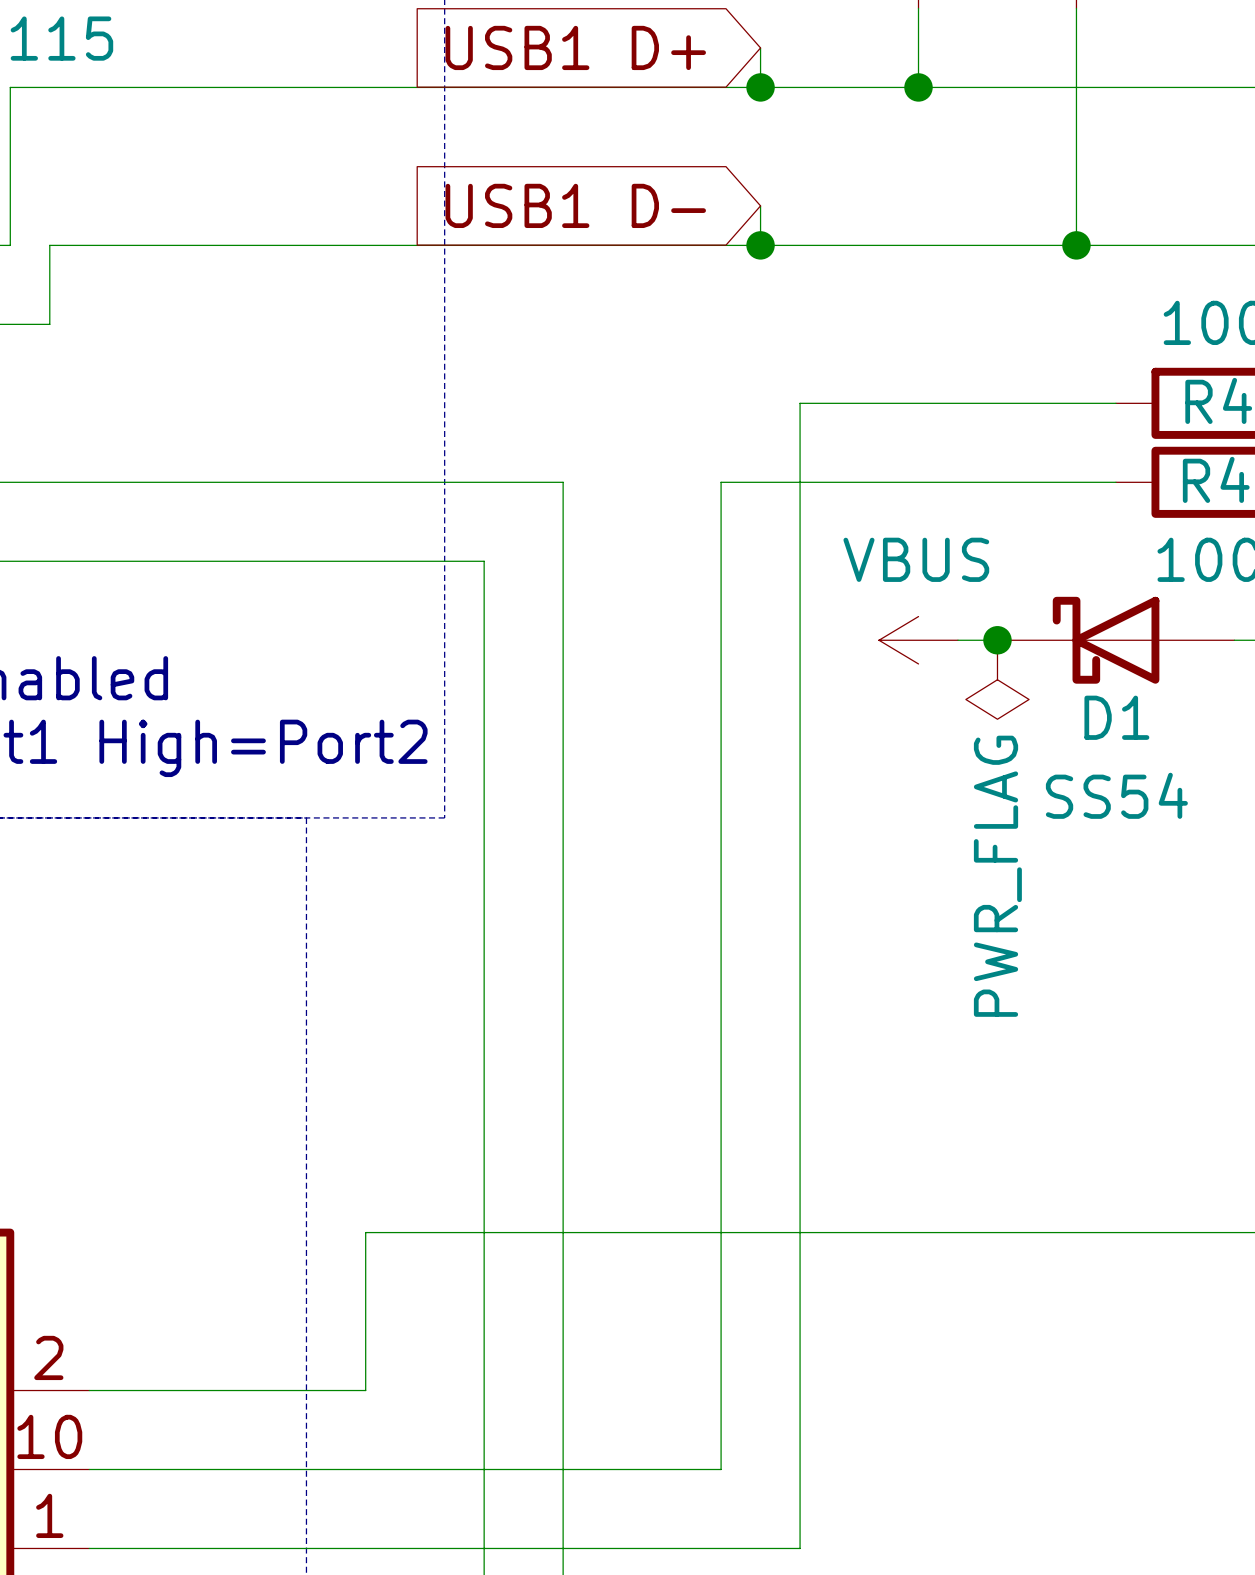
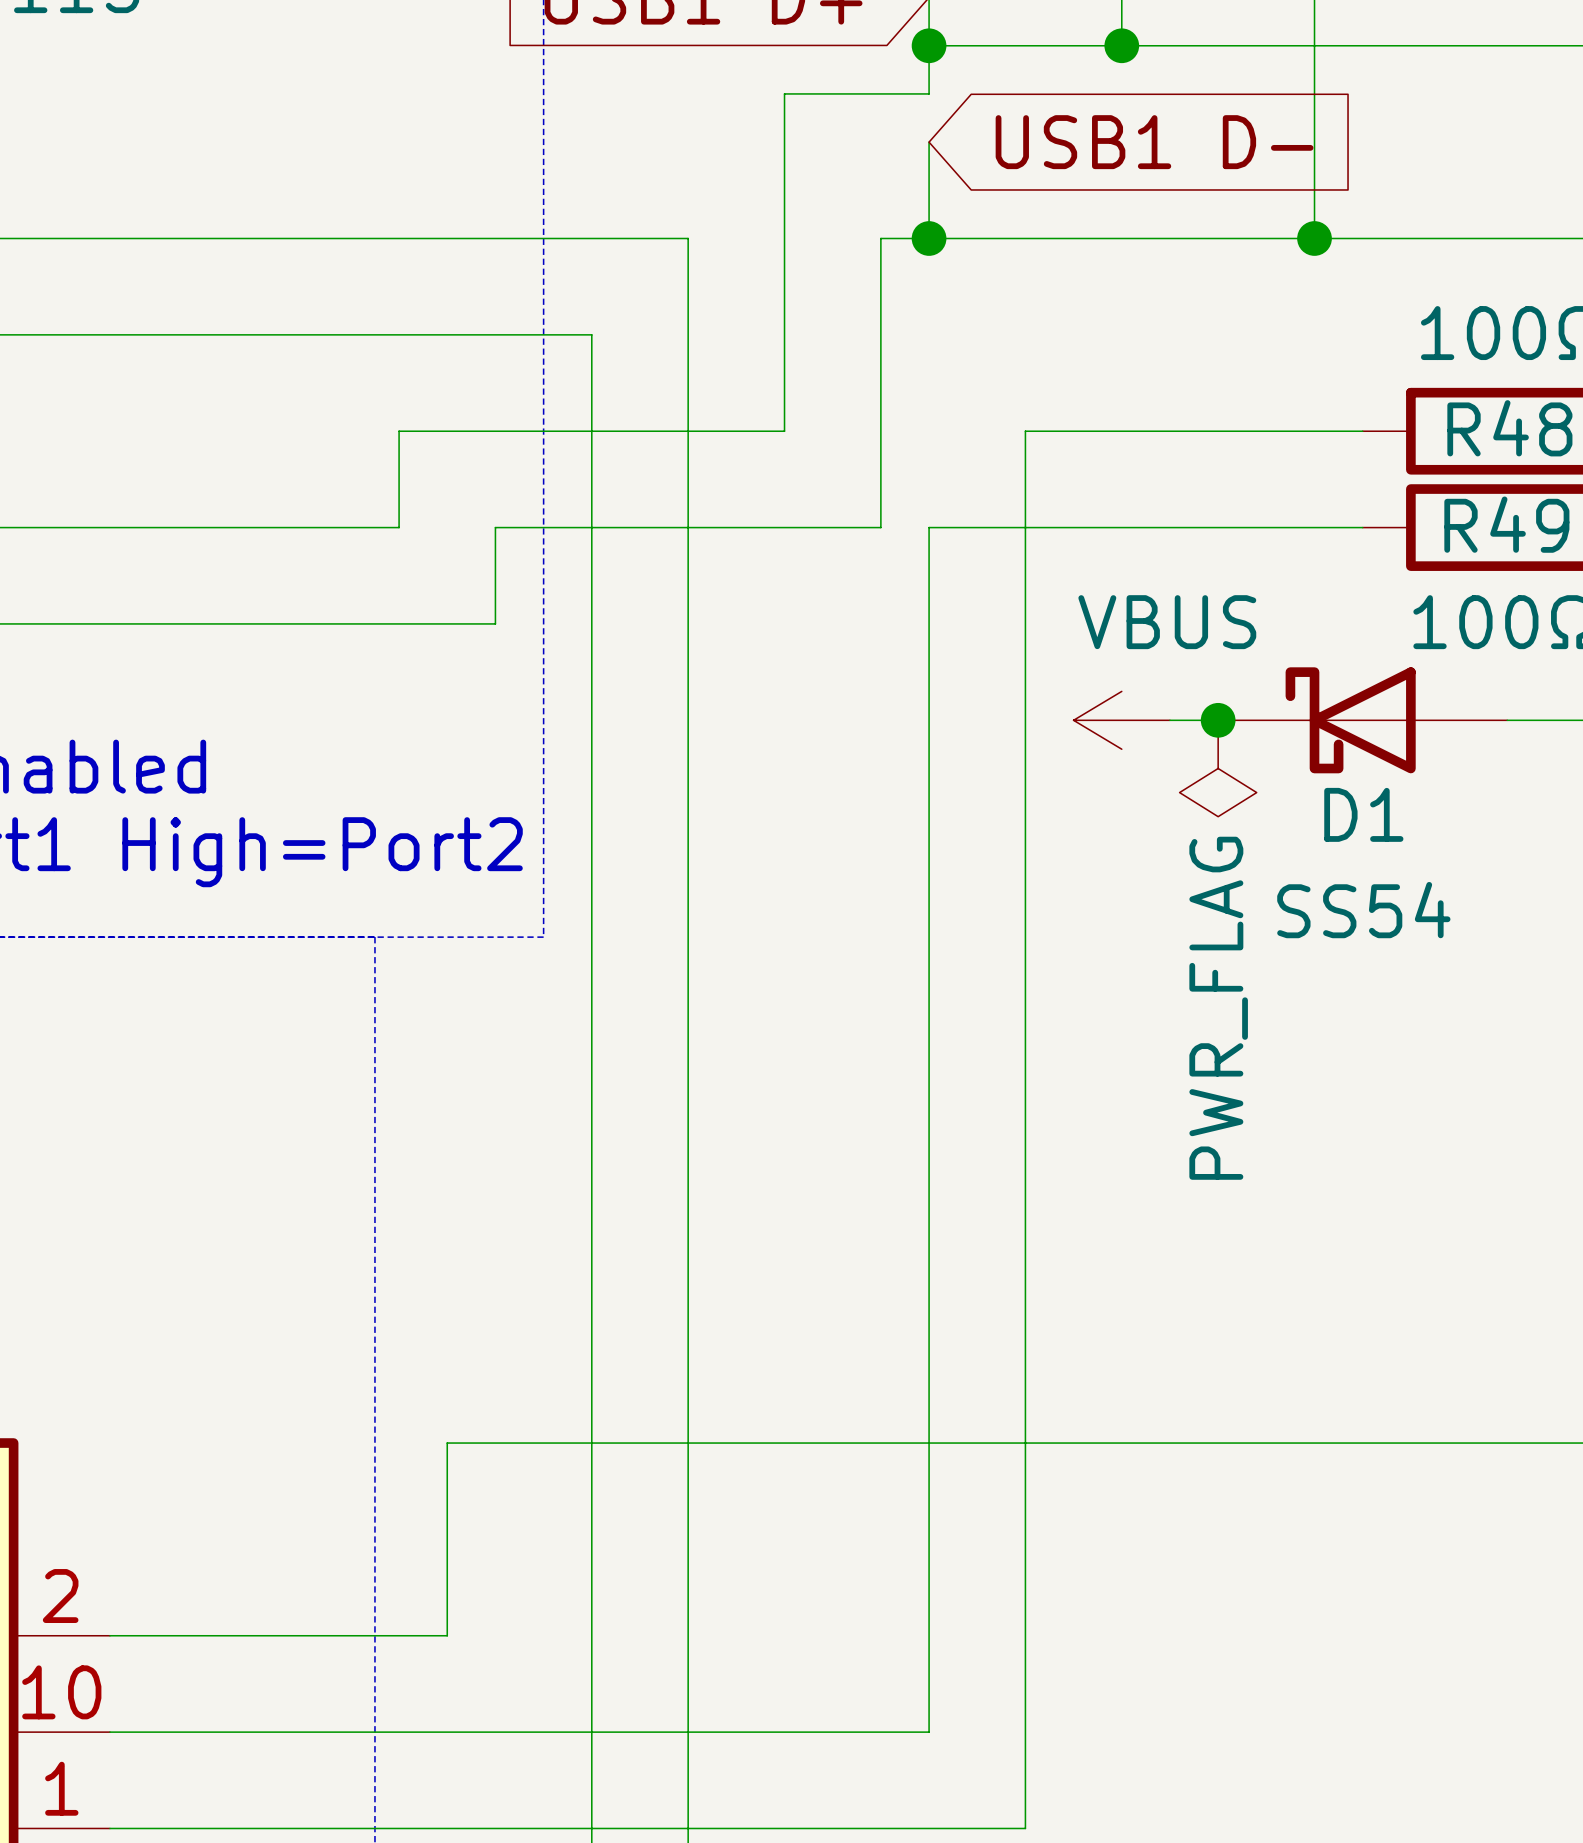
wire: (760, 87) (10, 87) (10, 245) -> (929, 45) (929, 93) (784, 93) (784, 431) (399, 431) (399, 527)
wire: none -> (929, 142) (929, 190)
global label rotation: 0° (575, 205) -> 180° (1154, 142)
global label position: USB1 D- (575, 205) -> USB1 D- (1154, 142)
wire: (49, 245) (49, 324) -> (61, 238) (13, 238)
wire: (563, 245) (721, 245) -> (688, 238) (688, 527) (880, 527) (880, 238)
wire: none -> (61, 334) (591, 334) (591, 623)
wire: (839, 403) (800, 403) (800, 1548) -> (1025, 431) (1025, 1828) (977, 1828)
wire: (326, 482) (405, 482) -> none
wire: (760, 482) (721, 482) (721, 1469) -> (929, 527) (929, 1732) (880, 1732)
power symbol text position: VBUS (916, 559) -> VBUS (1167, 622)
wire: (405, 561) (484, 561) -> (495, 623) (495, 527)

